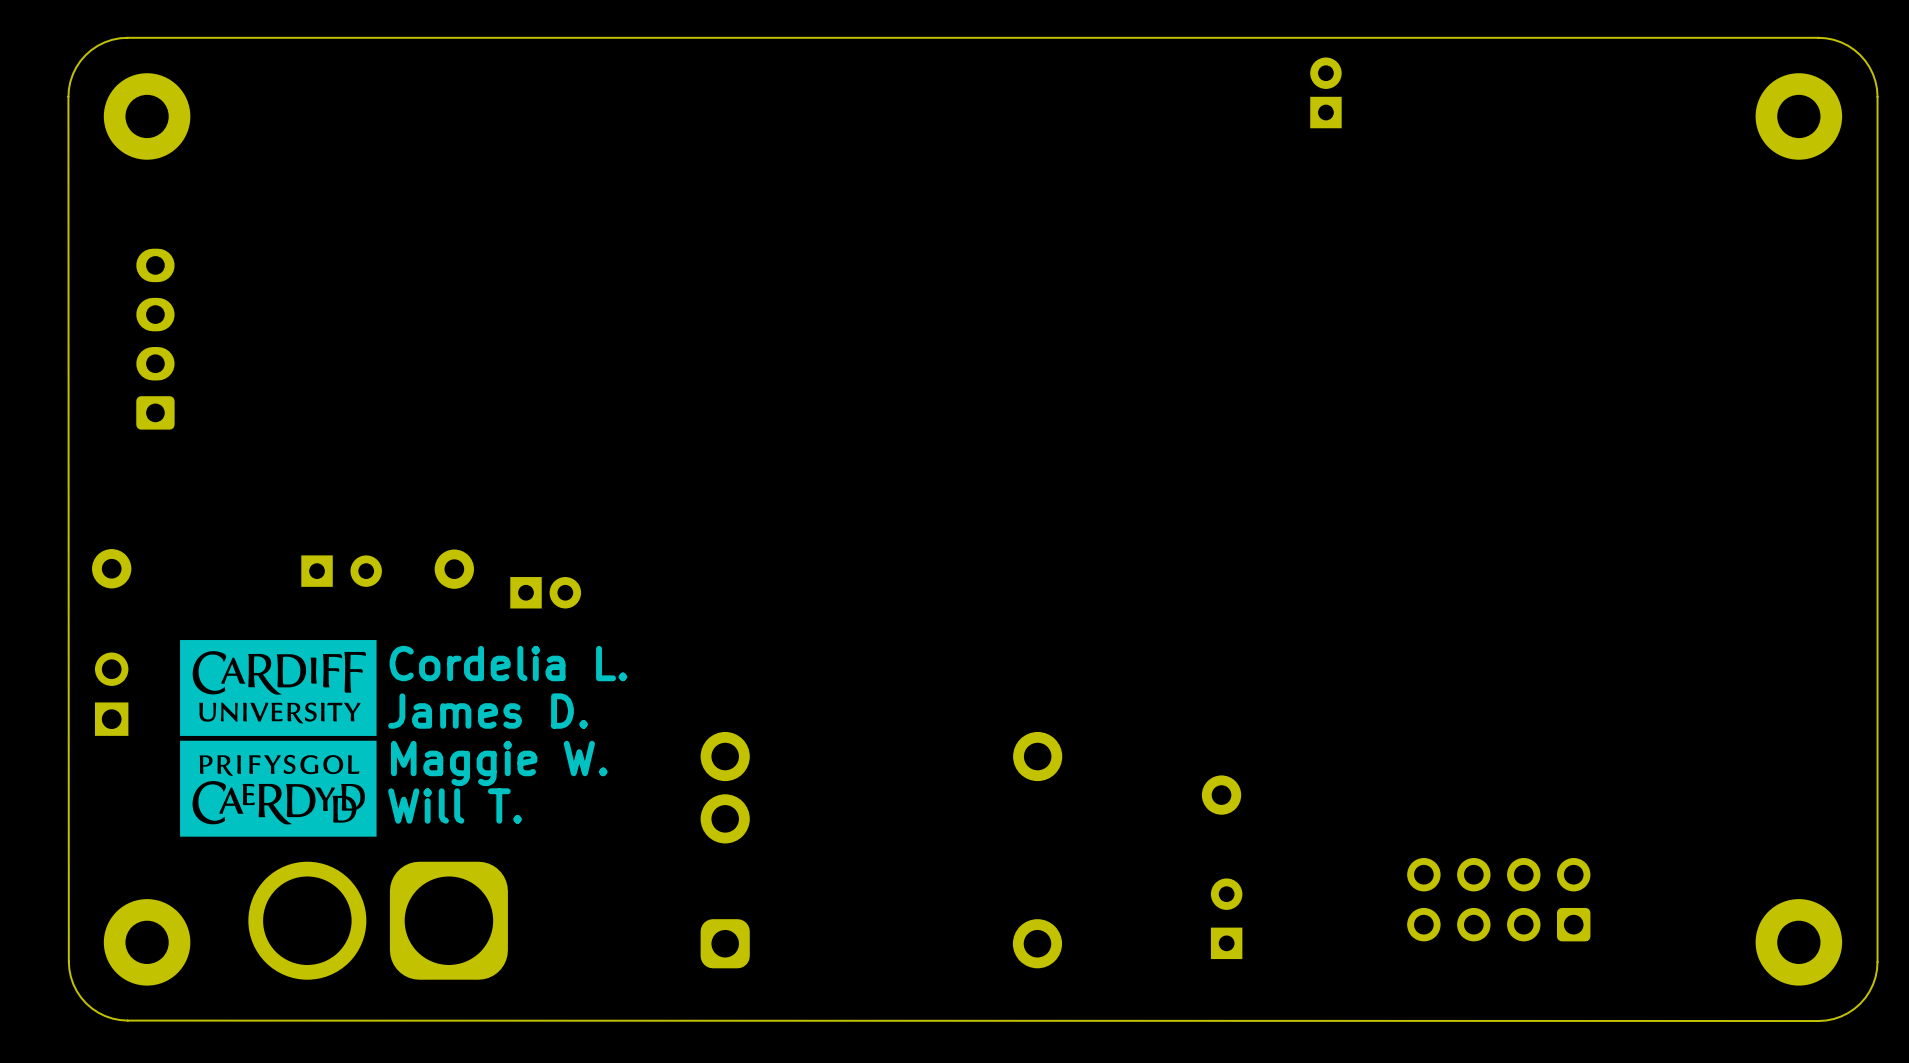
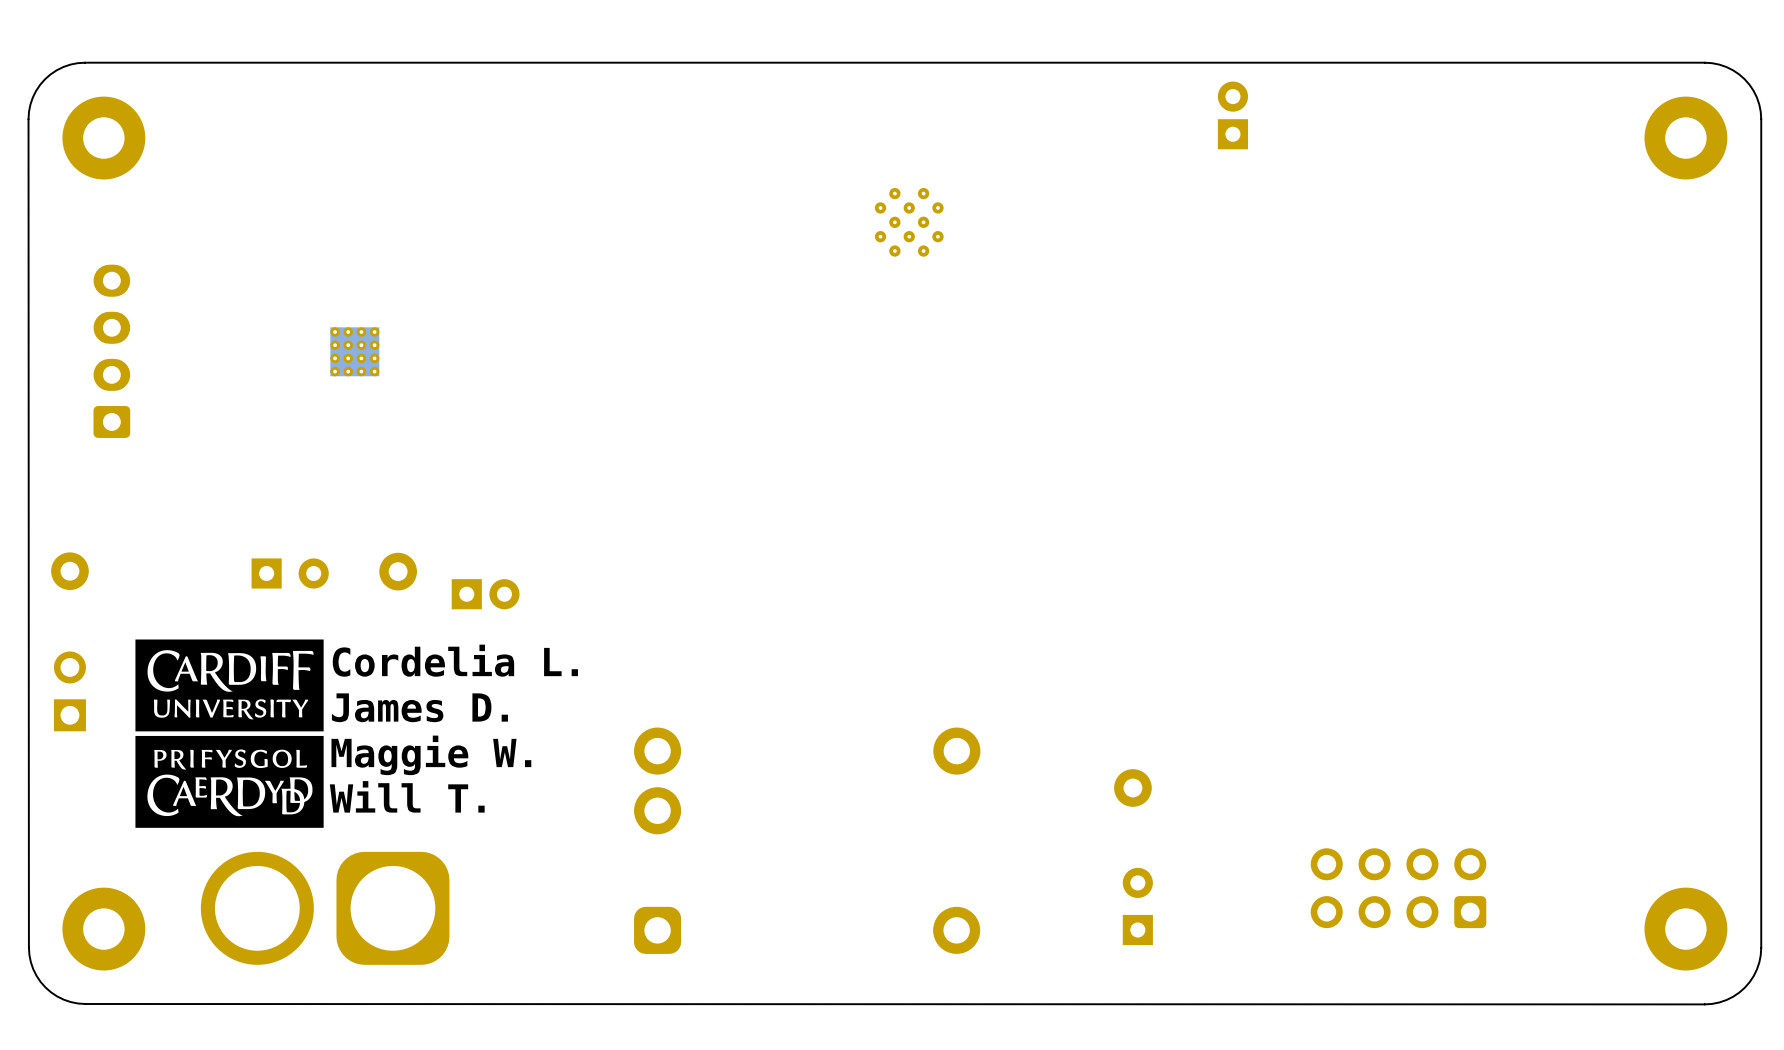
part: none -> (909, 222)
part: none -> (354, 351)

